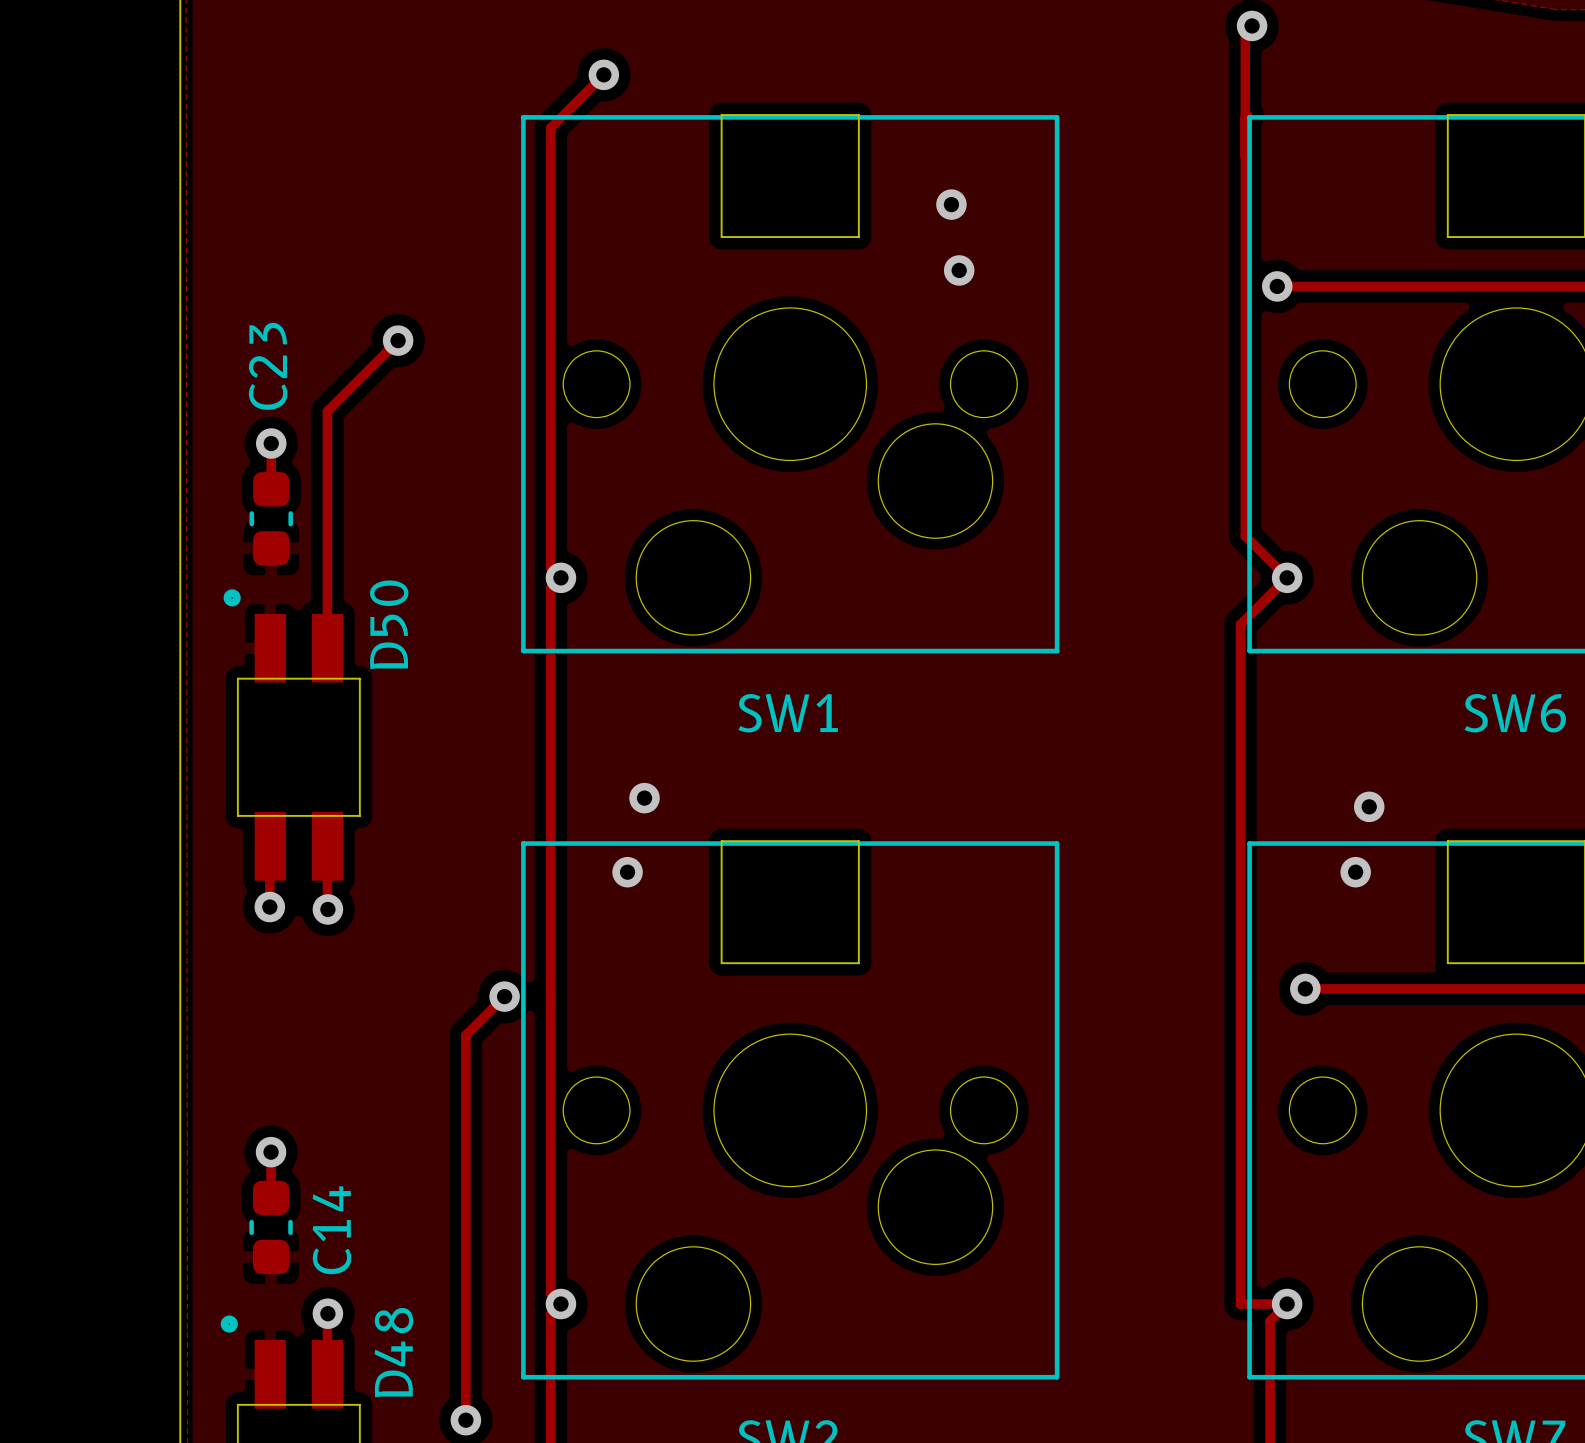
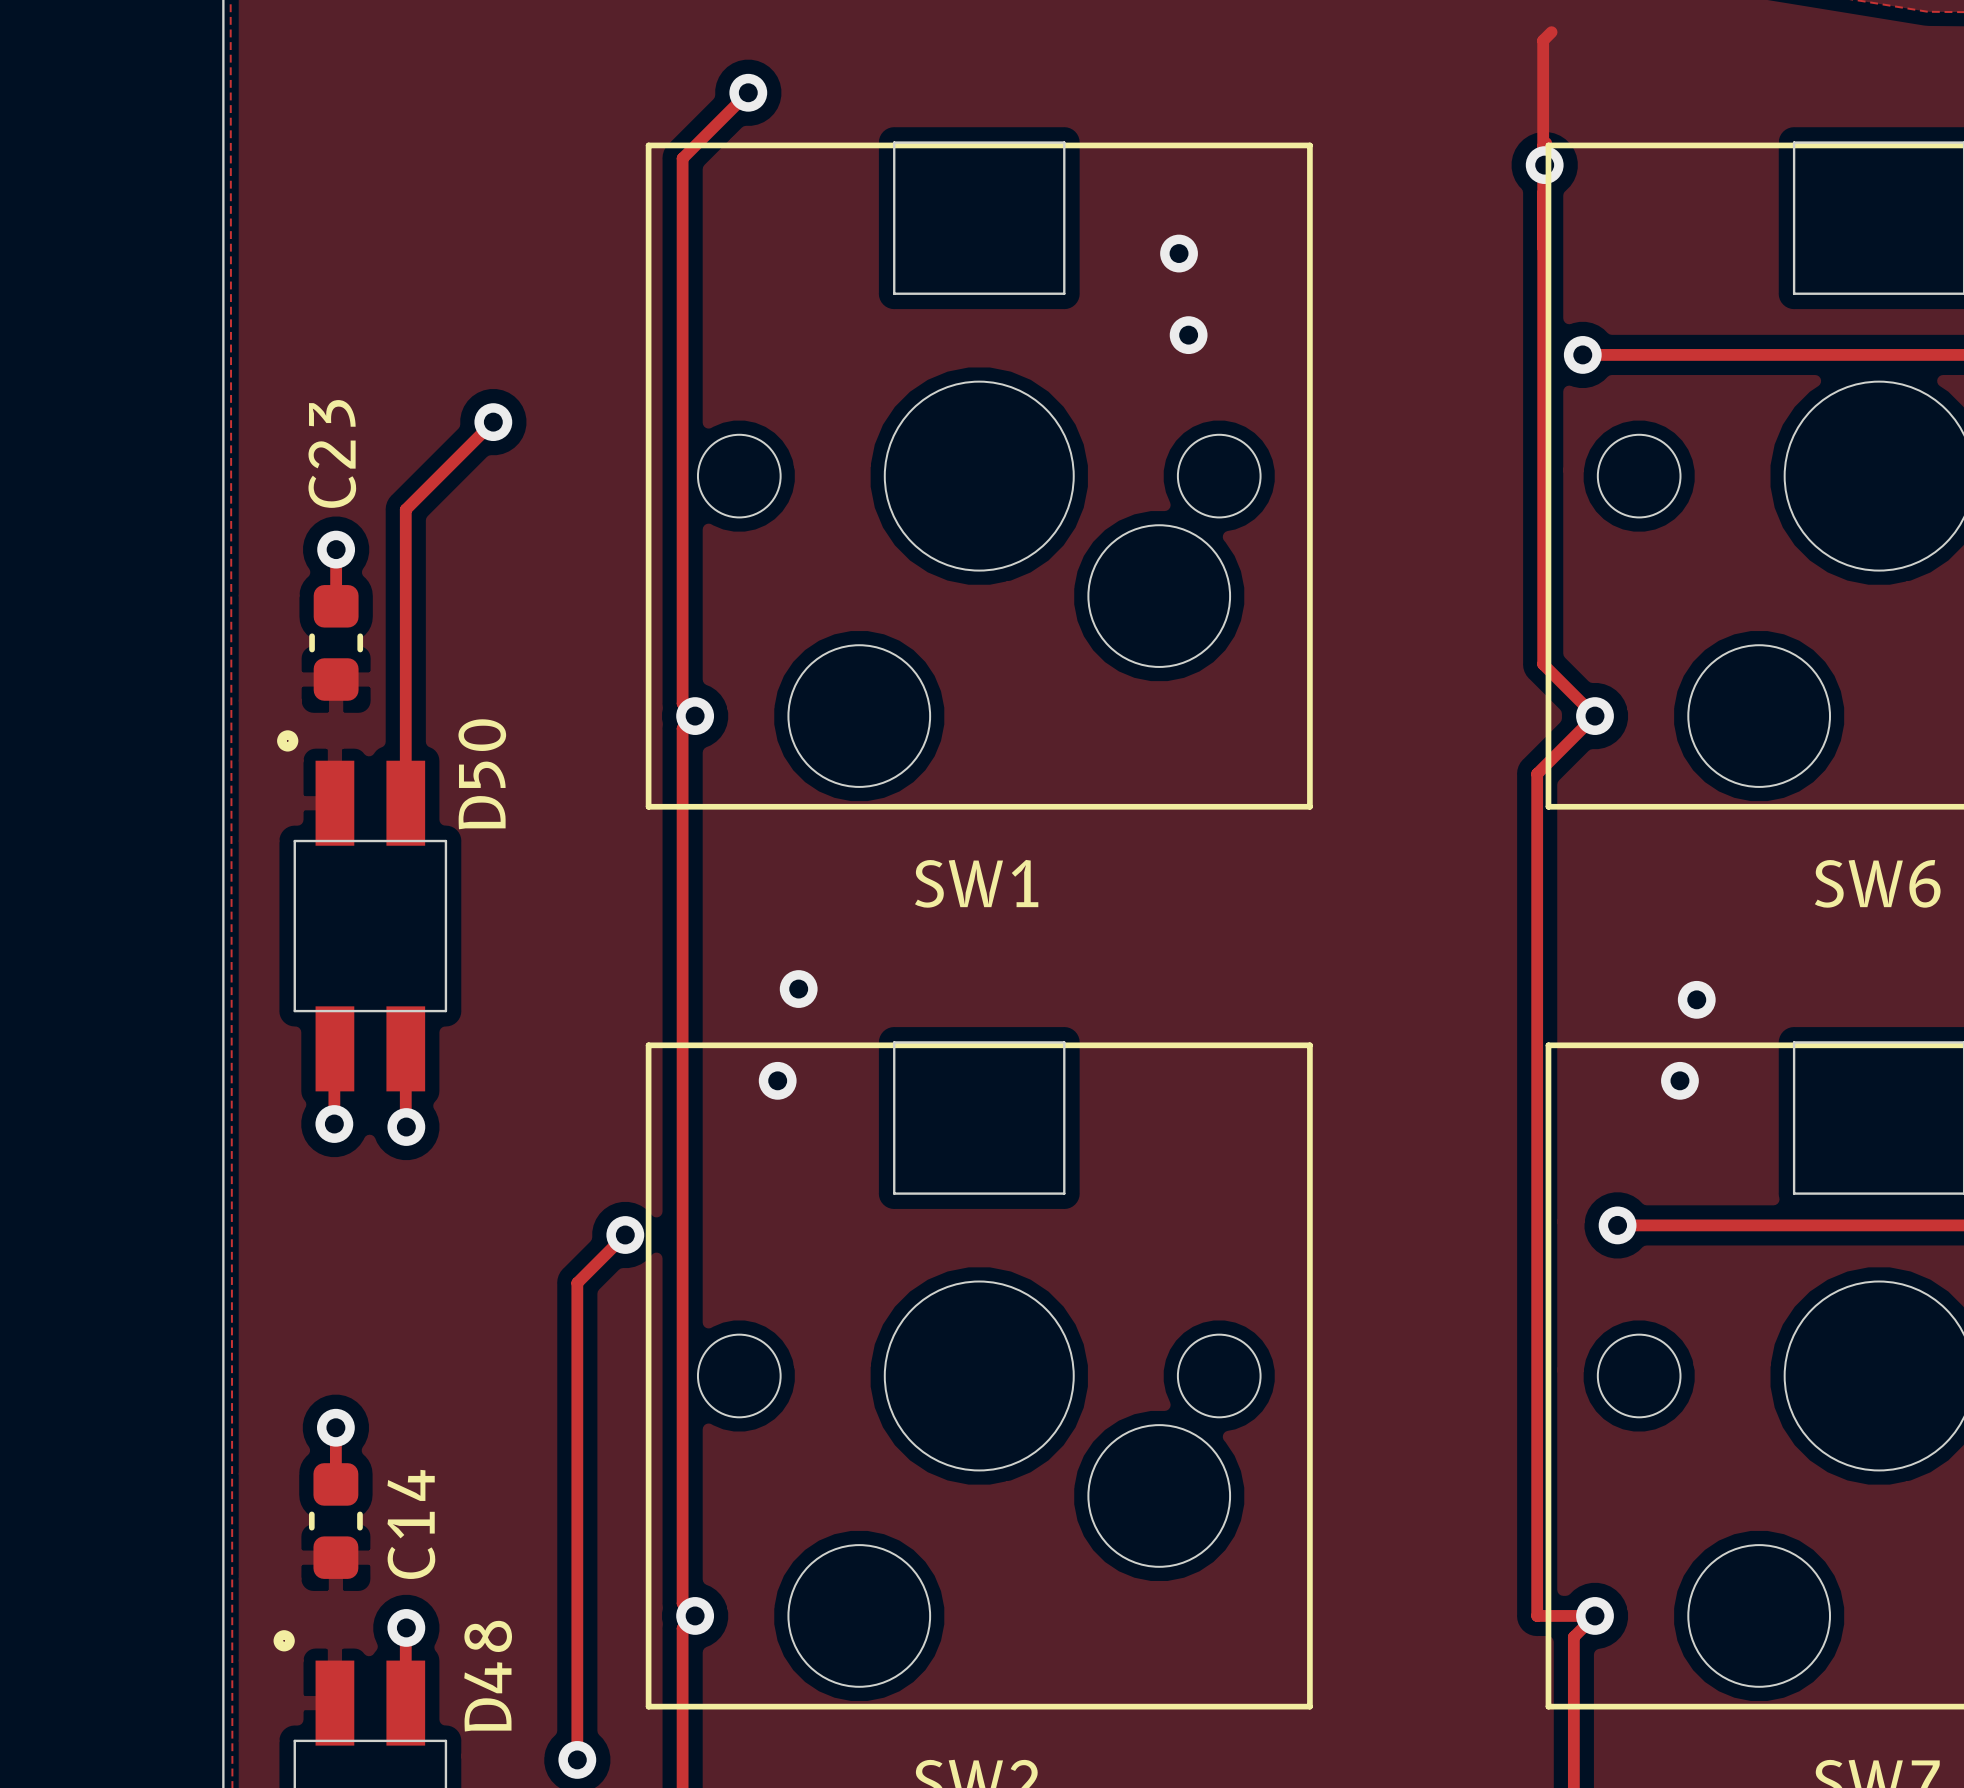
via position: (1252, 25) -> (1544, 165)

